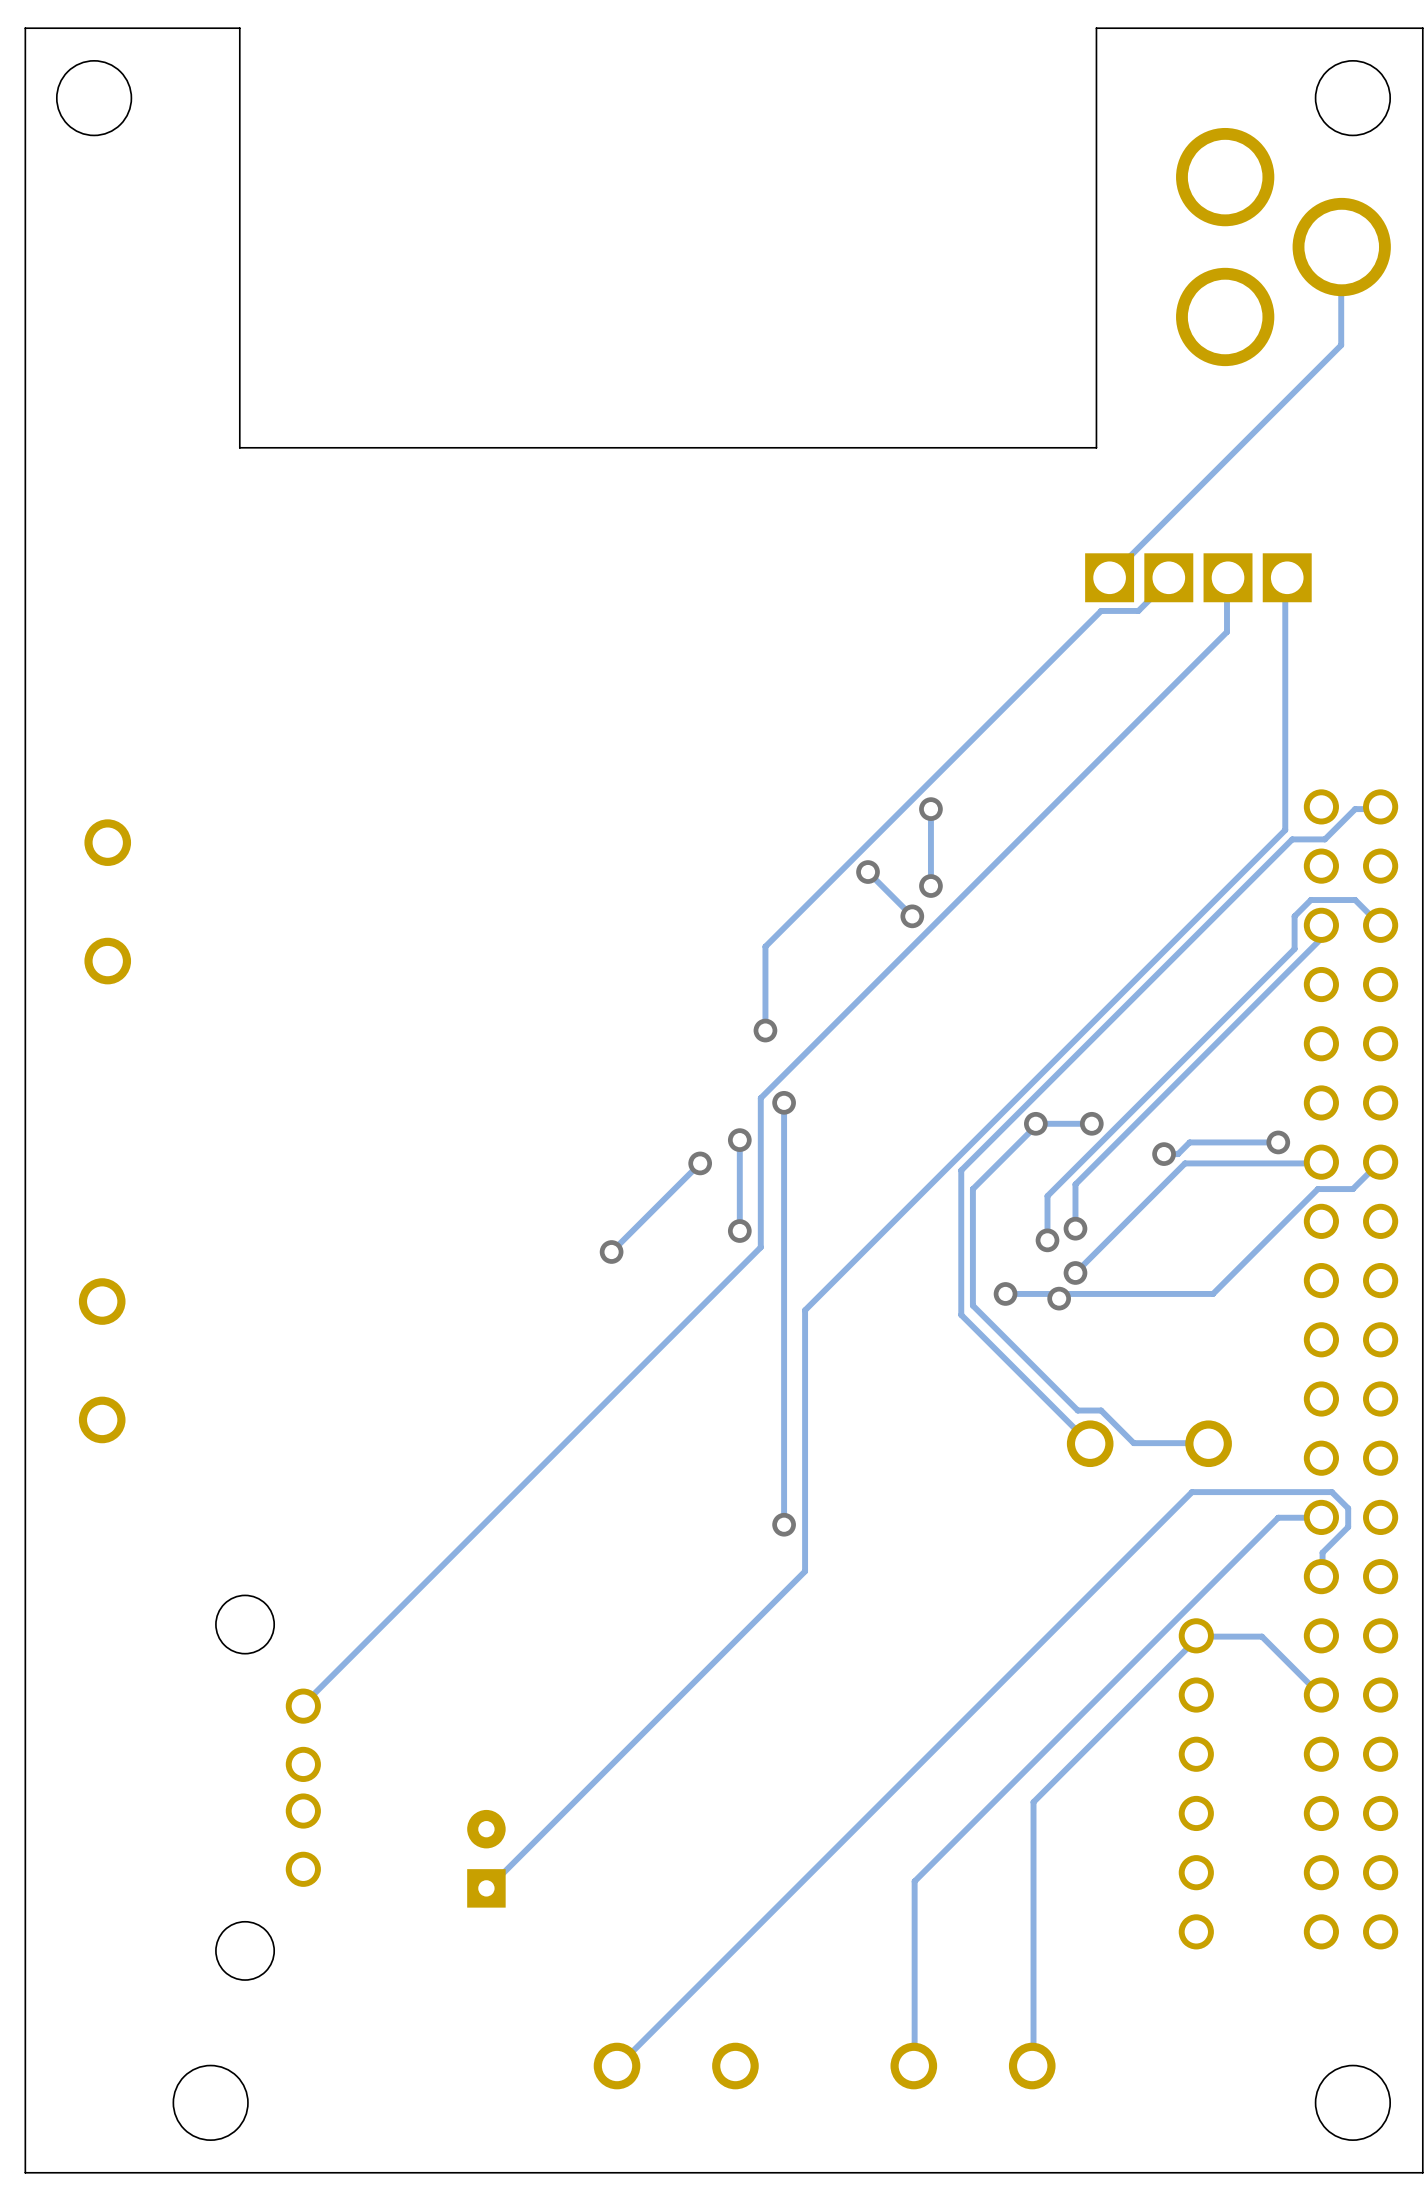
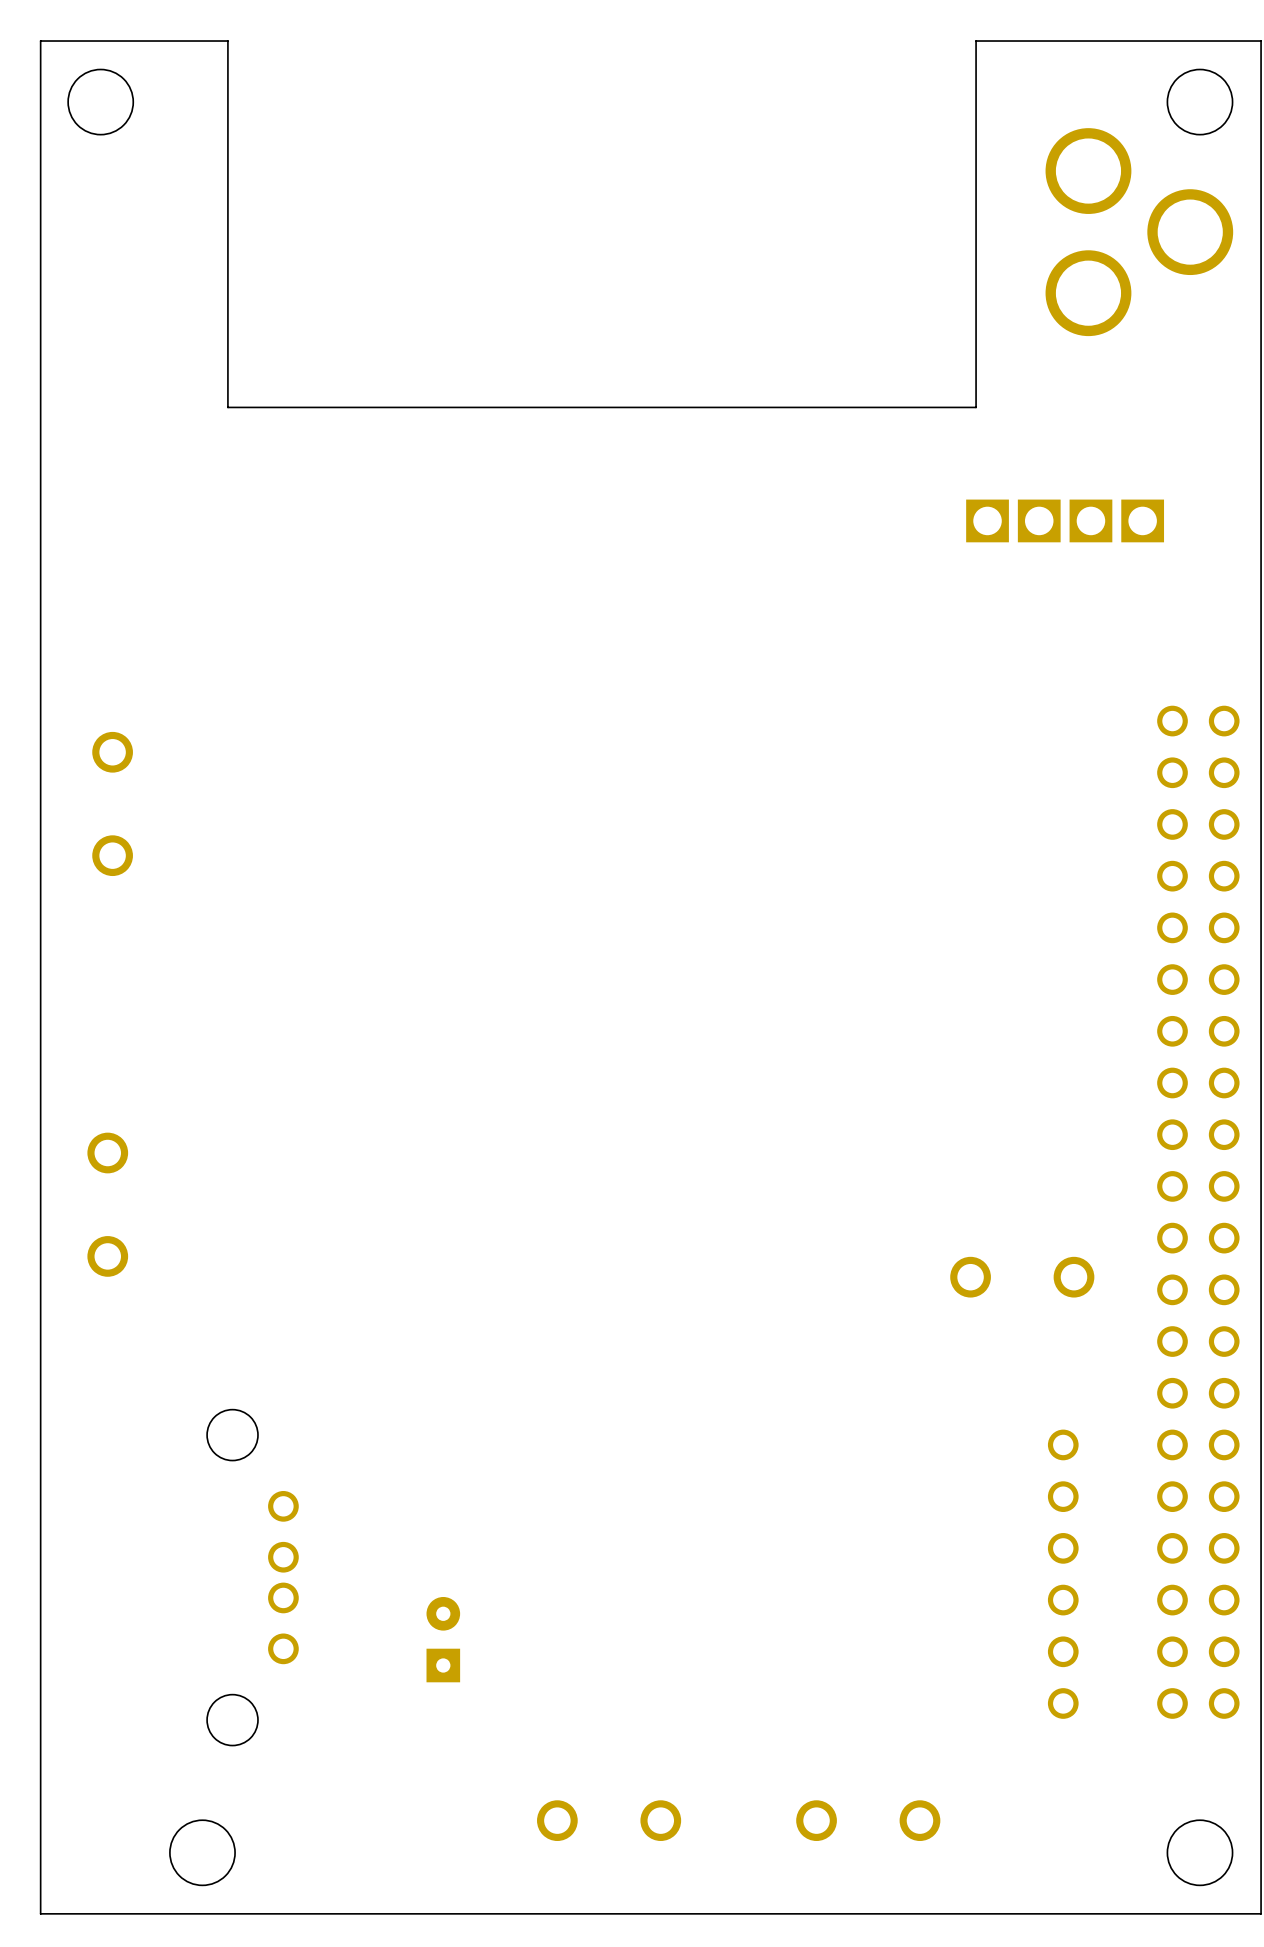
track: (1341, 247) (1341, 345) (1109, 577) -> none
track: (1168, 577) (1171, 578) (1138, 610) (1101, 610) (765, 946) (765, 1030) -> none
track: (1228, 577) (1226, 631) (760, 1098) (760, 1247) (303, 1706) -> none
track: (1287, 577) (1285, 578) (1285, 830) (805, 1310) (805, 1571) (486, 1888) -> none
track: (1380, 806) (1378, 809) (1355, 809) (1324, 839) (1292, 839) (961, 1170) (961, 1314) (1090, 1443) -> none
track: (930, 809) (930, 886) -> none
via: (930, 809) -> none
track: (868, 872) (912, 916) -> none
via: (868, 872) -> none
via: (930, 886) -> none
via: (912, 916) -> none
track: (1321, 925) (1320, 939) (1075, 1184) (1075, 1228) -> none
track: (1380, 925) (1355, 900) (1310, 900) (1294, 916) (1294, 948) (1047, 1196) (1047, 1240) -> none
via: (765, 1030) -> none
track: (784, 1102) (784, 1524) -> none
via: (784, 1102) -> none
via: (1035, 1123) -> none
track: (1091, 1123) (1035, 1123) (1035, 1126) (972, 1189) (972, 1305) (1077, 1410) (1101, 1410) (1133, 1443) (1208, 1443) -> none
via: (1091, 1123) -> none
track: (739, 1140) (739, 1231) -> none
via: (739, 1140) -> none
track: (1278, 1142) (1189, 1142) (1178, 1154) (1164, 1154) -> none
via: (1278, 1142) -> none
via: (1164, 1154) -> none
track: (1321, 1162) (1185, 1163) (1075, 1272) -> none
track: (1380, 1162) (1352, 1189) (1317, 1189) (1213, 1293) (1005, 1293) -> none
track: (700, 1163) (611, 1252) -> none
via: (700, 1163) -> none
via: (1075, 1228) -> none
via: (739, 1231) -> none
via: (1047, 1240) -> none
via: (611, 1252) -> none
via: (1075, 1272) -> none
via: (1005, 1293) -> none
via: (1059, 1298) -> none
track: (1321, 1517) (1278, 1517) (914, 1881) (913, 2066) -> none
via: (784, 1524) -> none
track: (1321, 1576) (1322, 1552) (1348, 1527) (1348, 1508) (1331, 1492) (1192, 1492) (617, 2066) -> none
track: (1321, 1695) (1261, 1636) (1196, 1635) (1196, 1638) (1033, 1802) (1032, 2066) -> none

